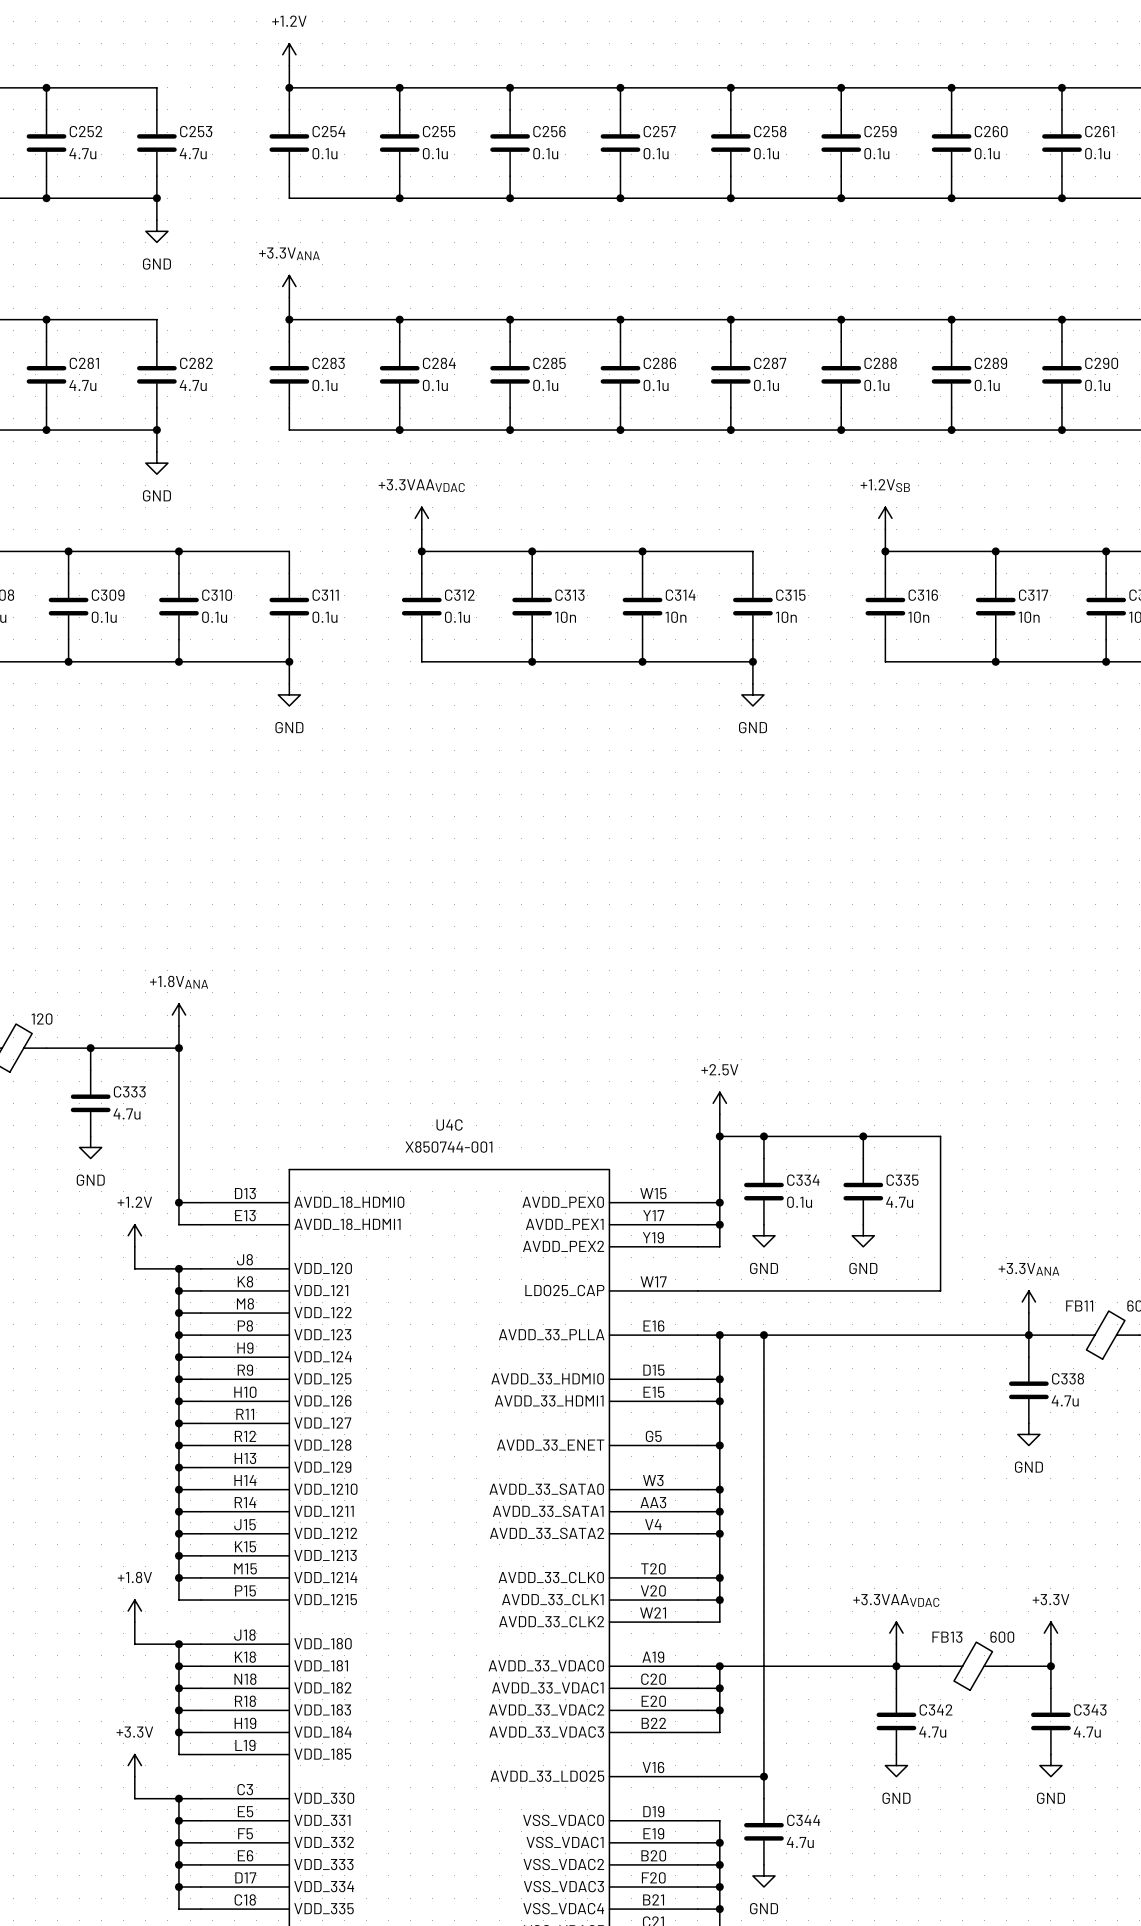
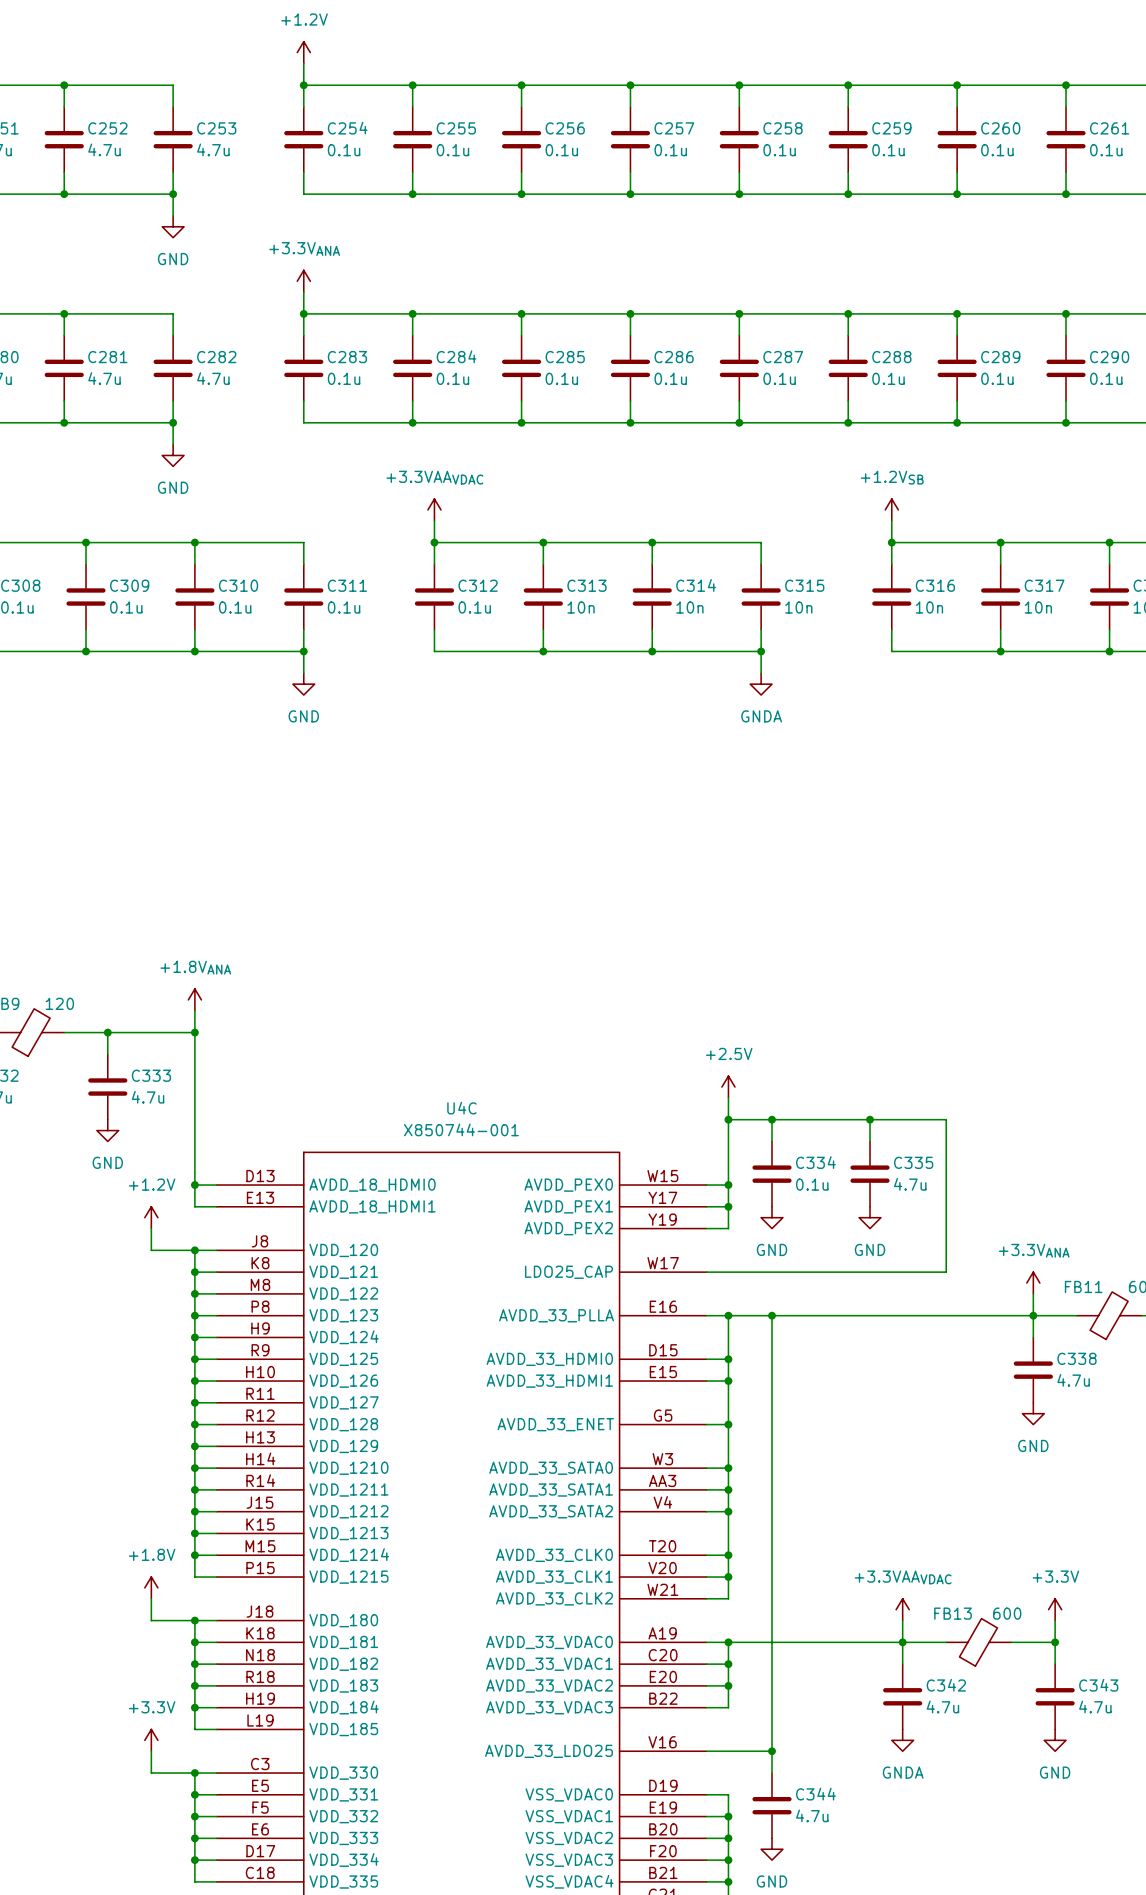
power symbol: GND (752, 694) -> GNDA (761, 684)
power symbol: GND (896, 1765) -> GNDA (902, 1740)

